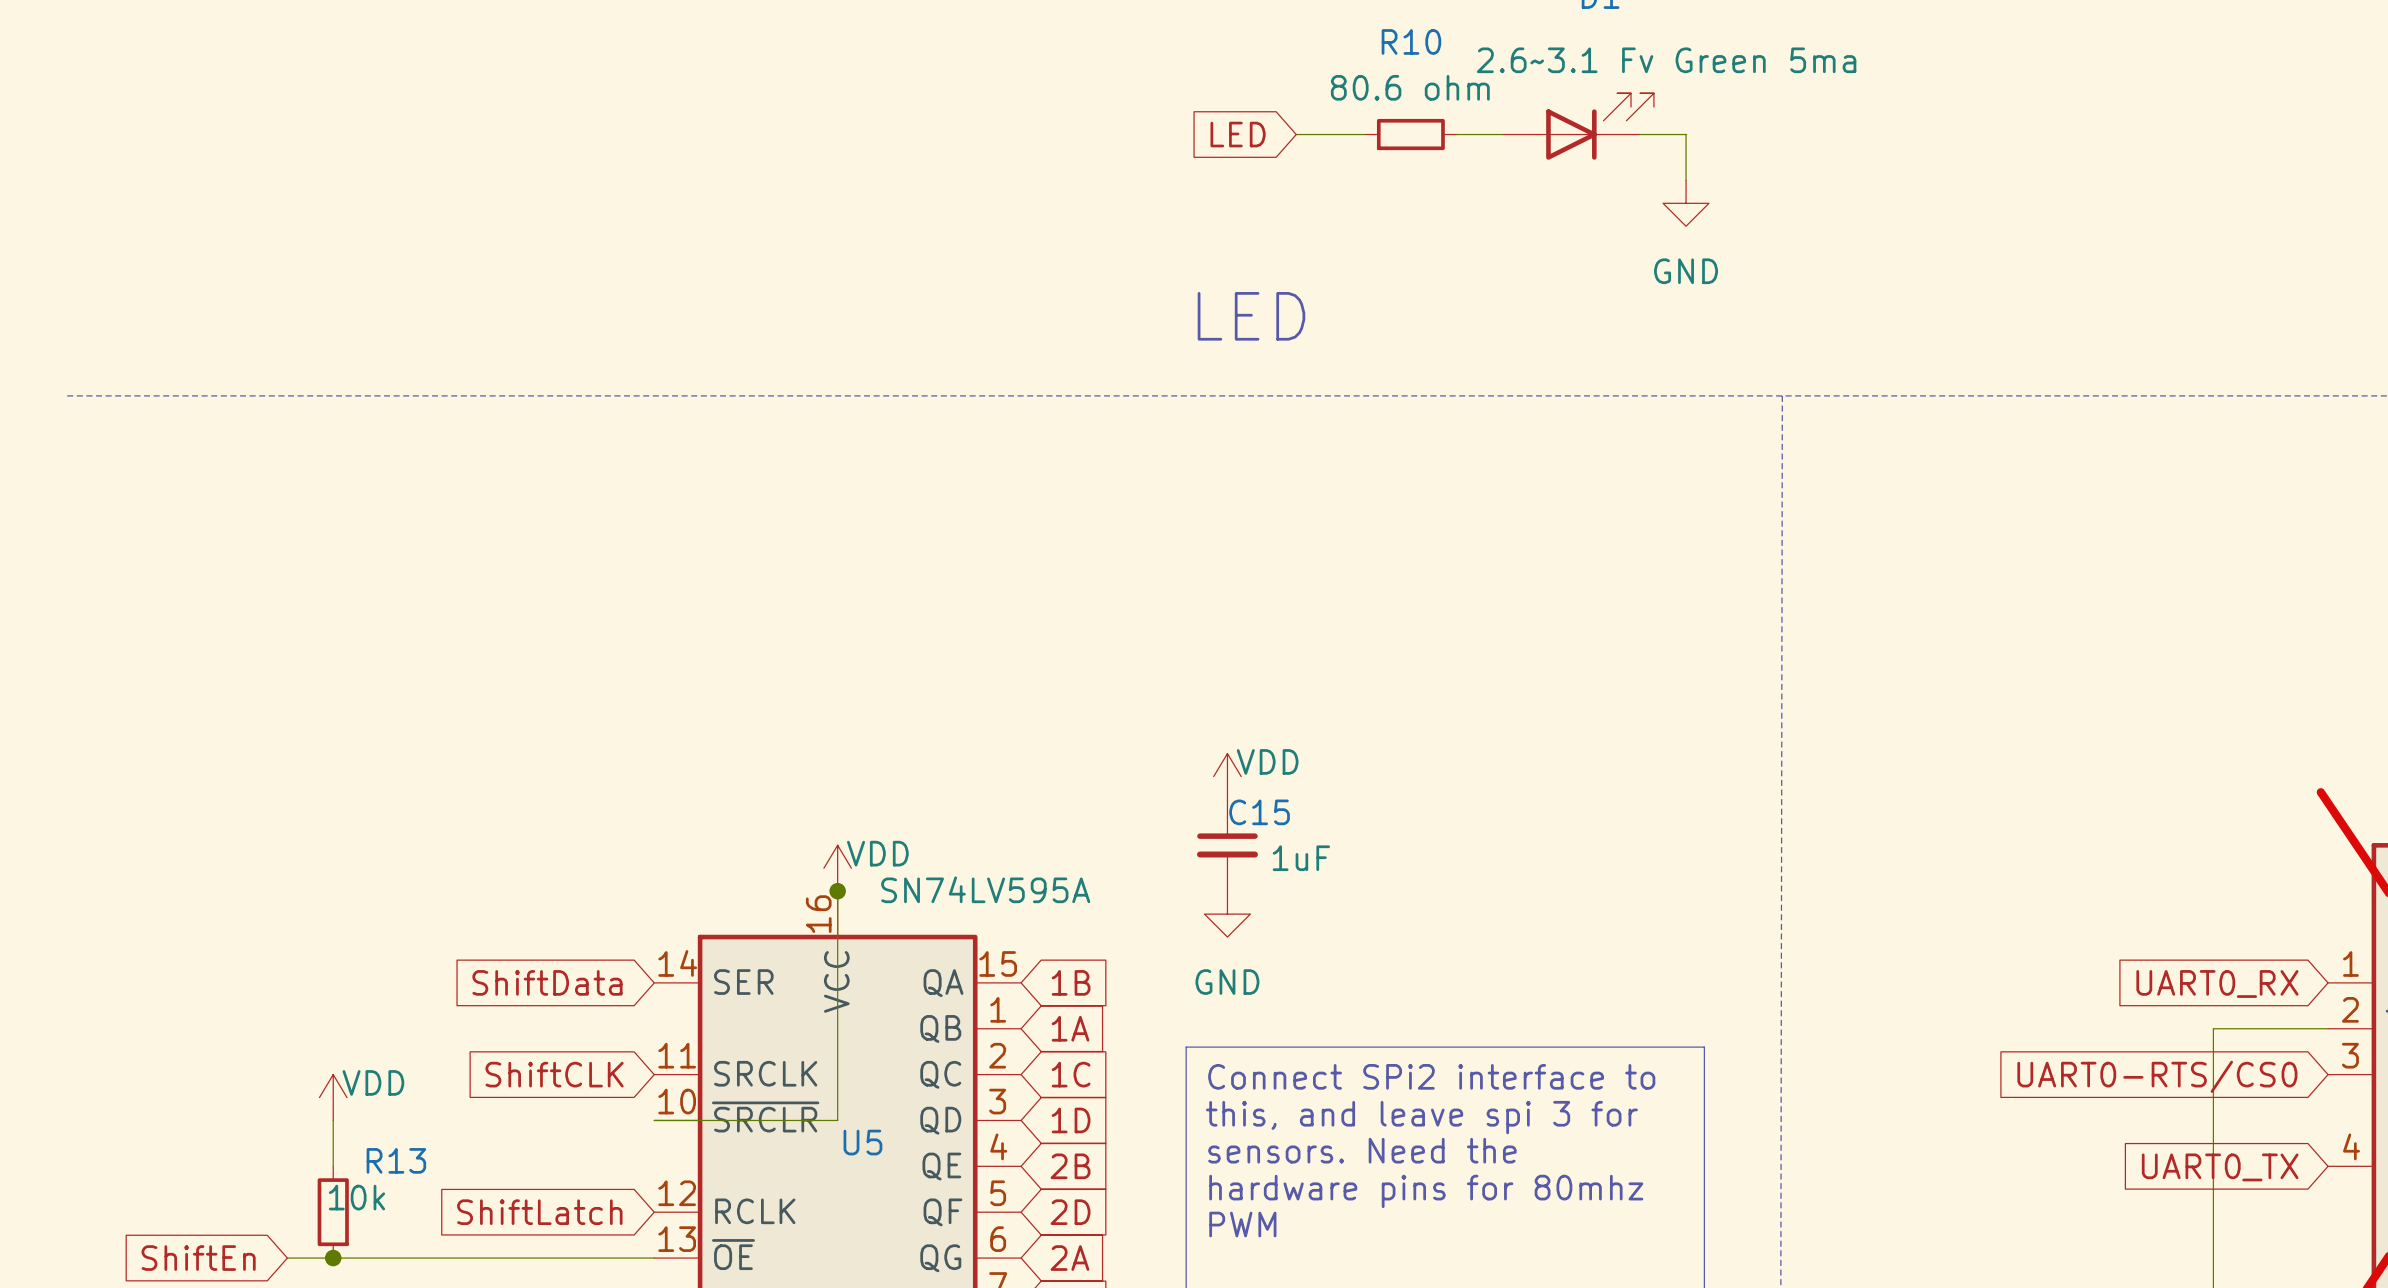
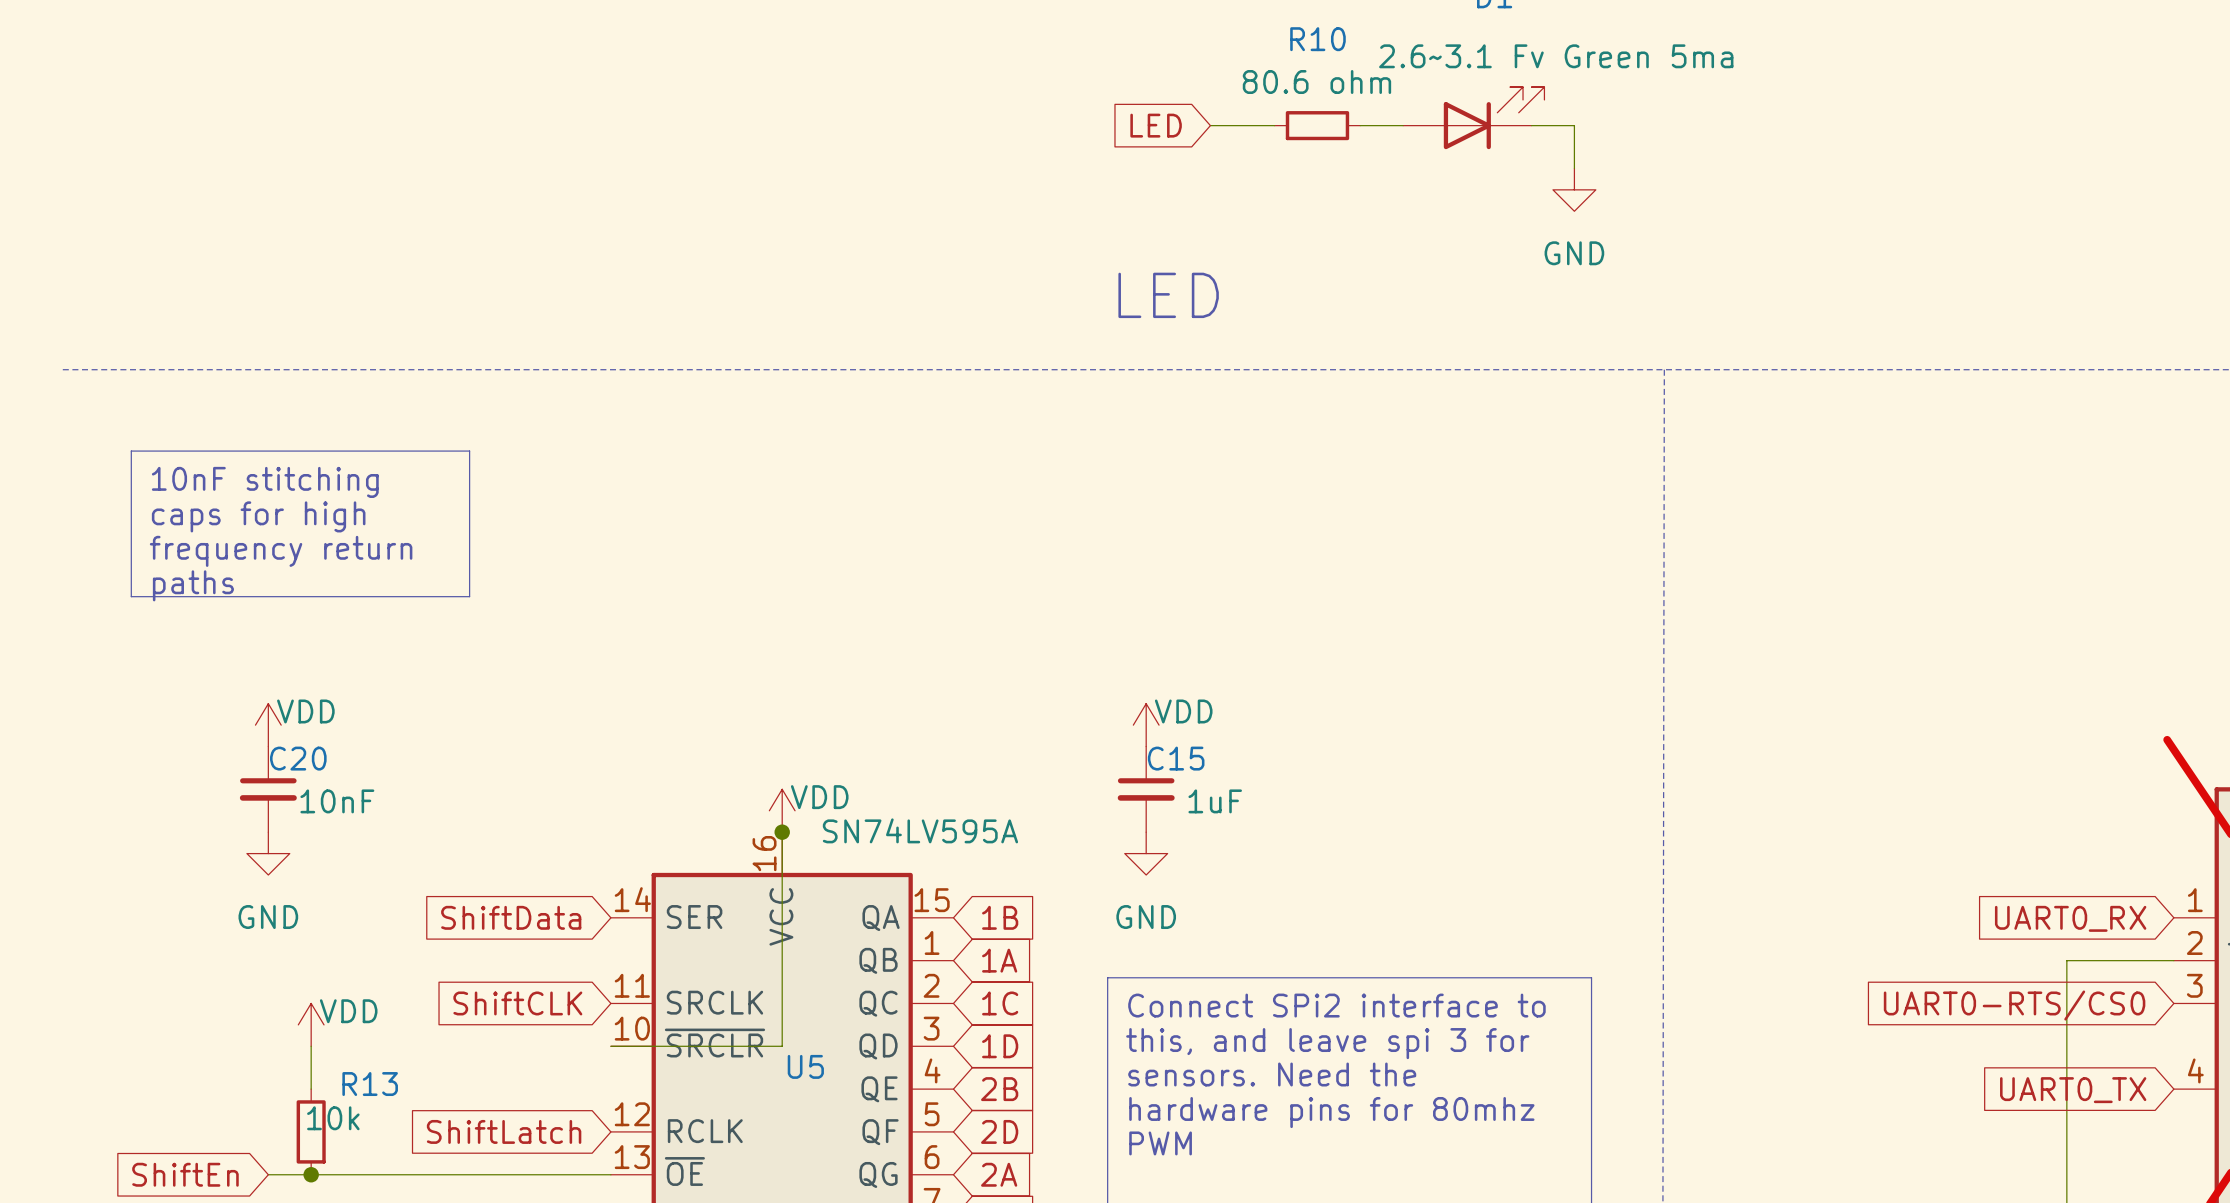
line: none -> (131, 451) (469, 451) (469, 596) (131, 596) (131, 451)
text: none -> 10nF stitching (265, 482)
text: none -> caps for high (258, 516)
text: none -> frequency return (281, 551)
text: none -> paths (193, 585)
power symbol: none -> VDD (268, 725)
C20: none -> 10nF (268, 789)
power symbol: none -> GND (268, 853)

